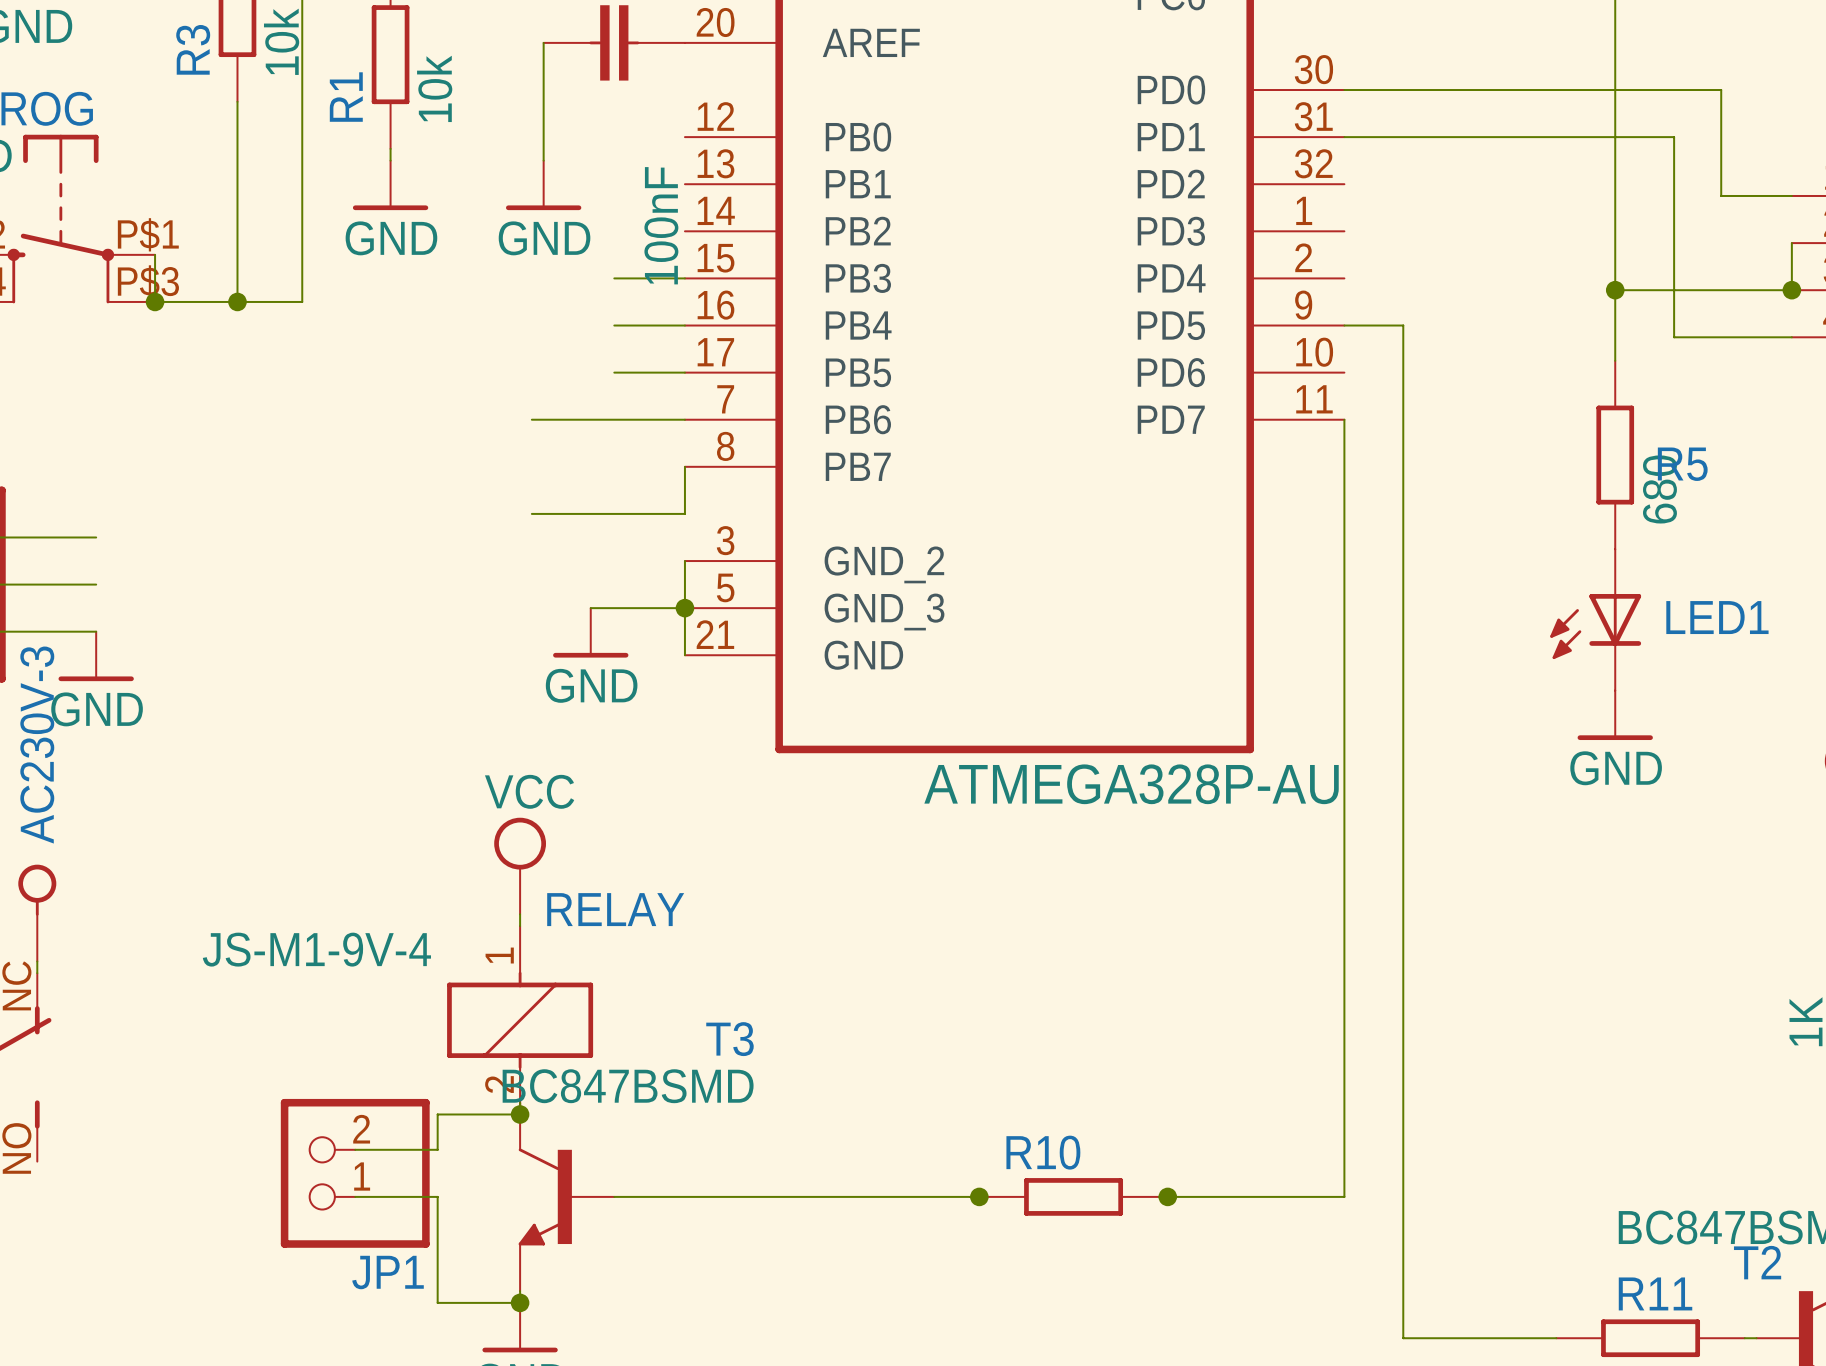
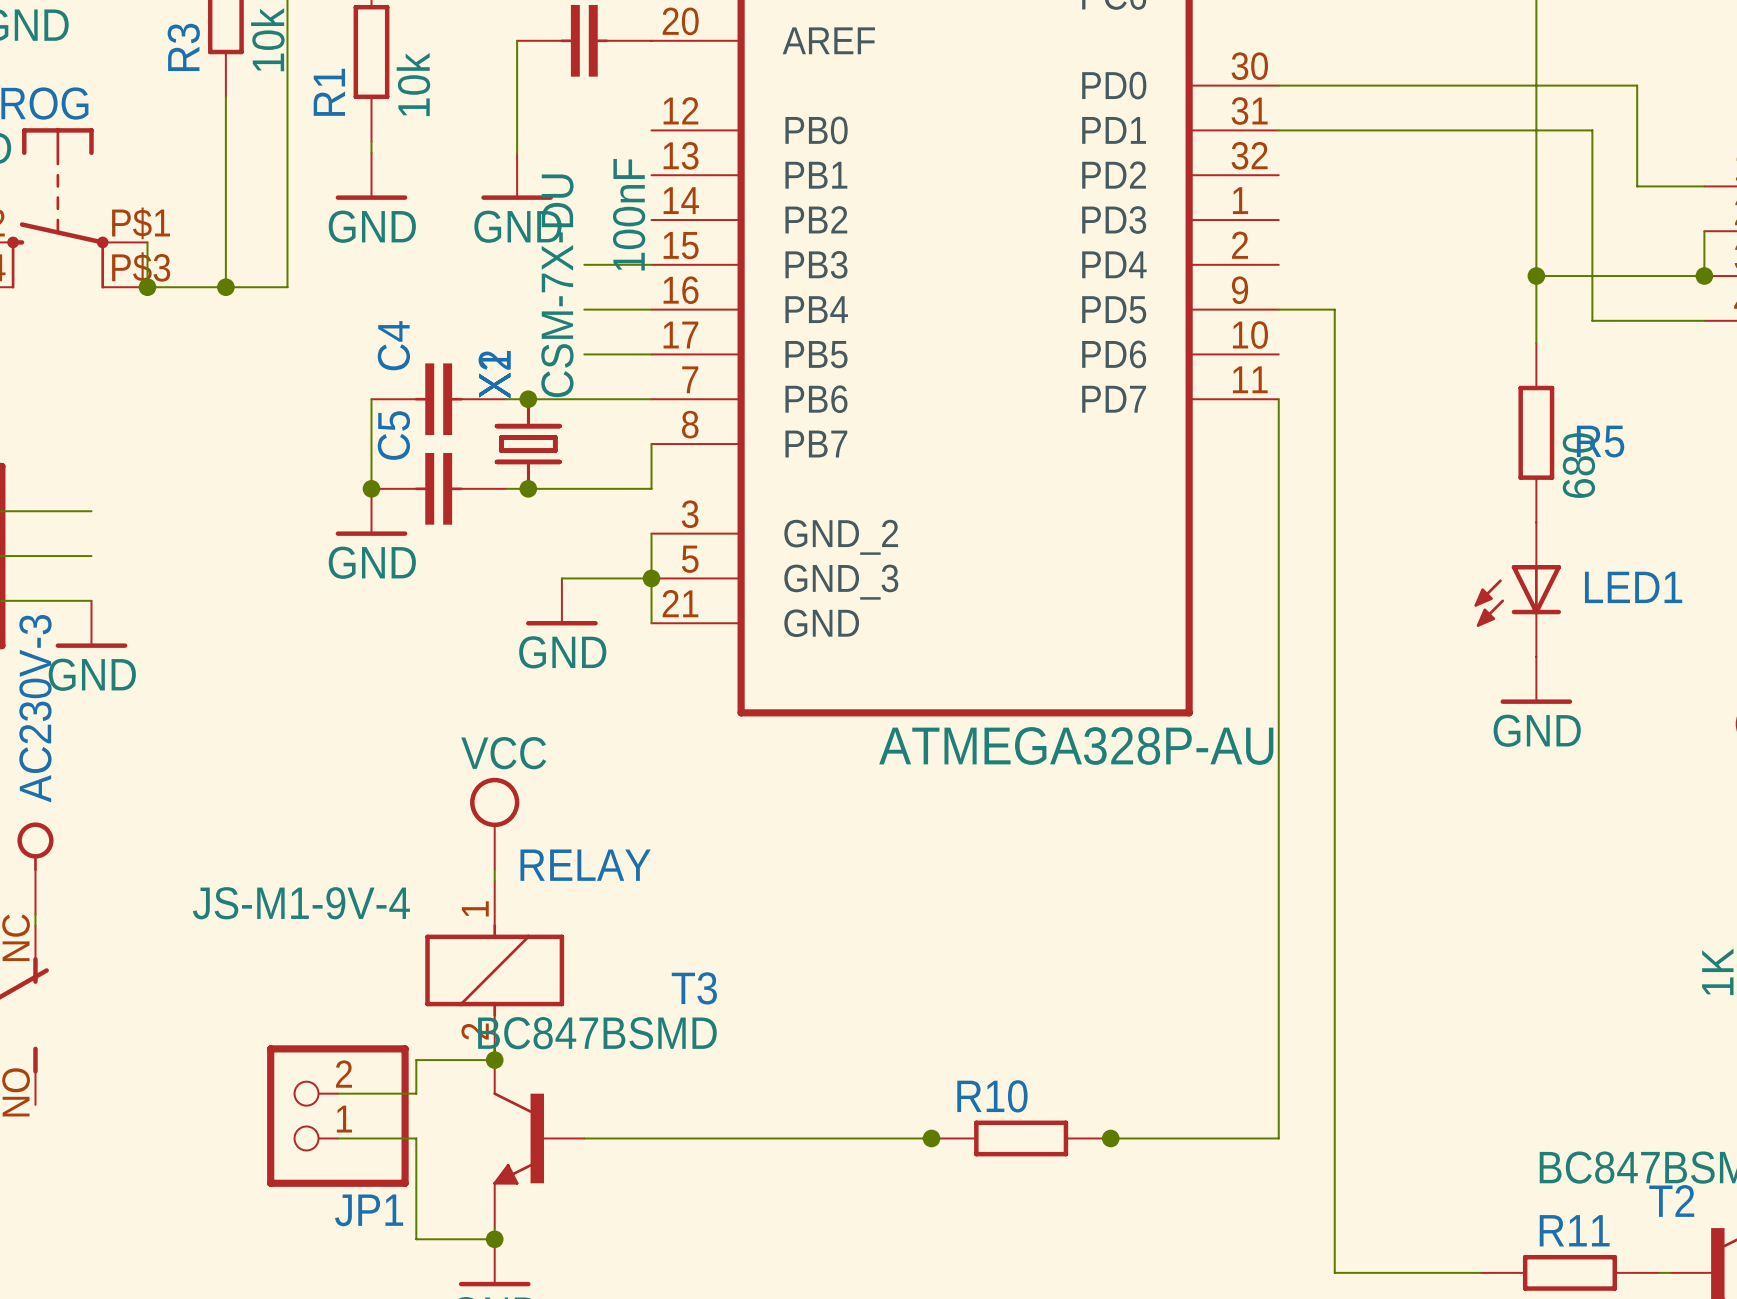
wire: none -> (371, 399) (371, 488)
C4: none -> (438, 399)
junction: none -> (528, 399)
part: none -> (528, 444)
part: none -> CSM-7X-DU (528, 444)
junction: none -> (371, 488)
C5: none -> (438, 488)
junction: none -> (528, 488)
power symbol: none -> GND (371, 512)

